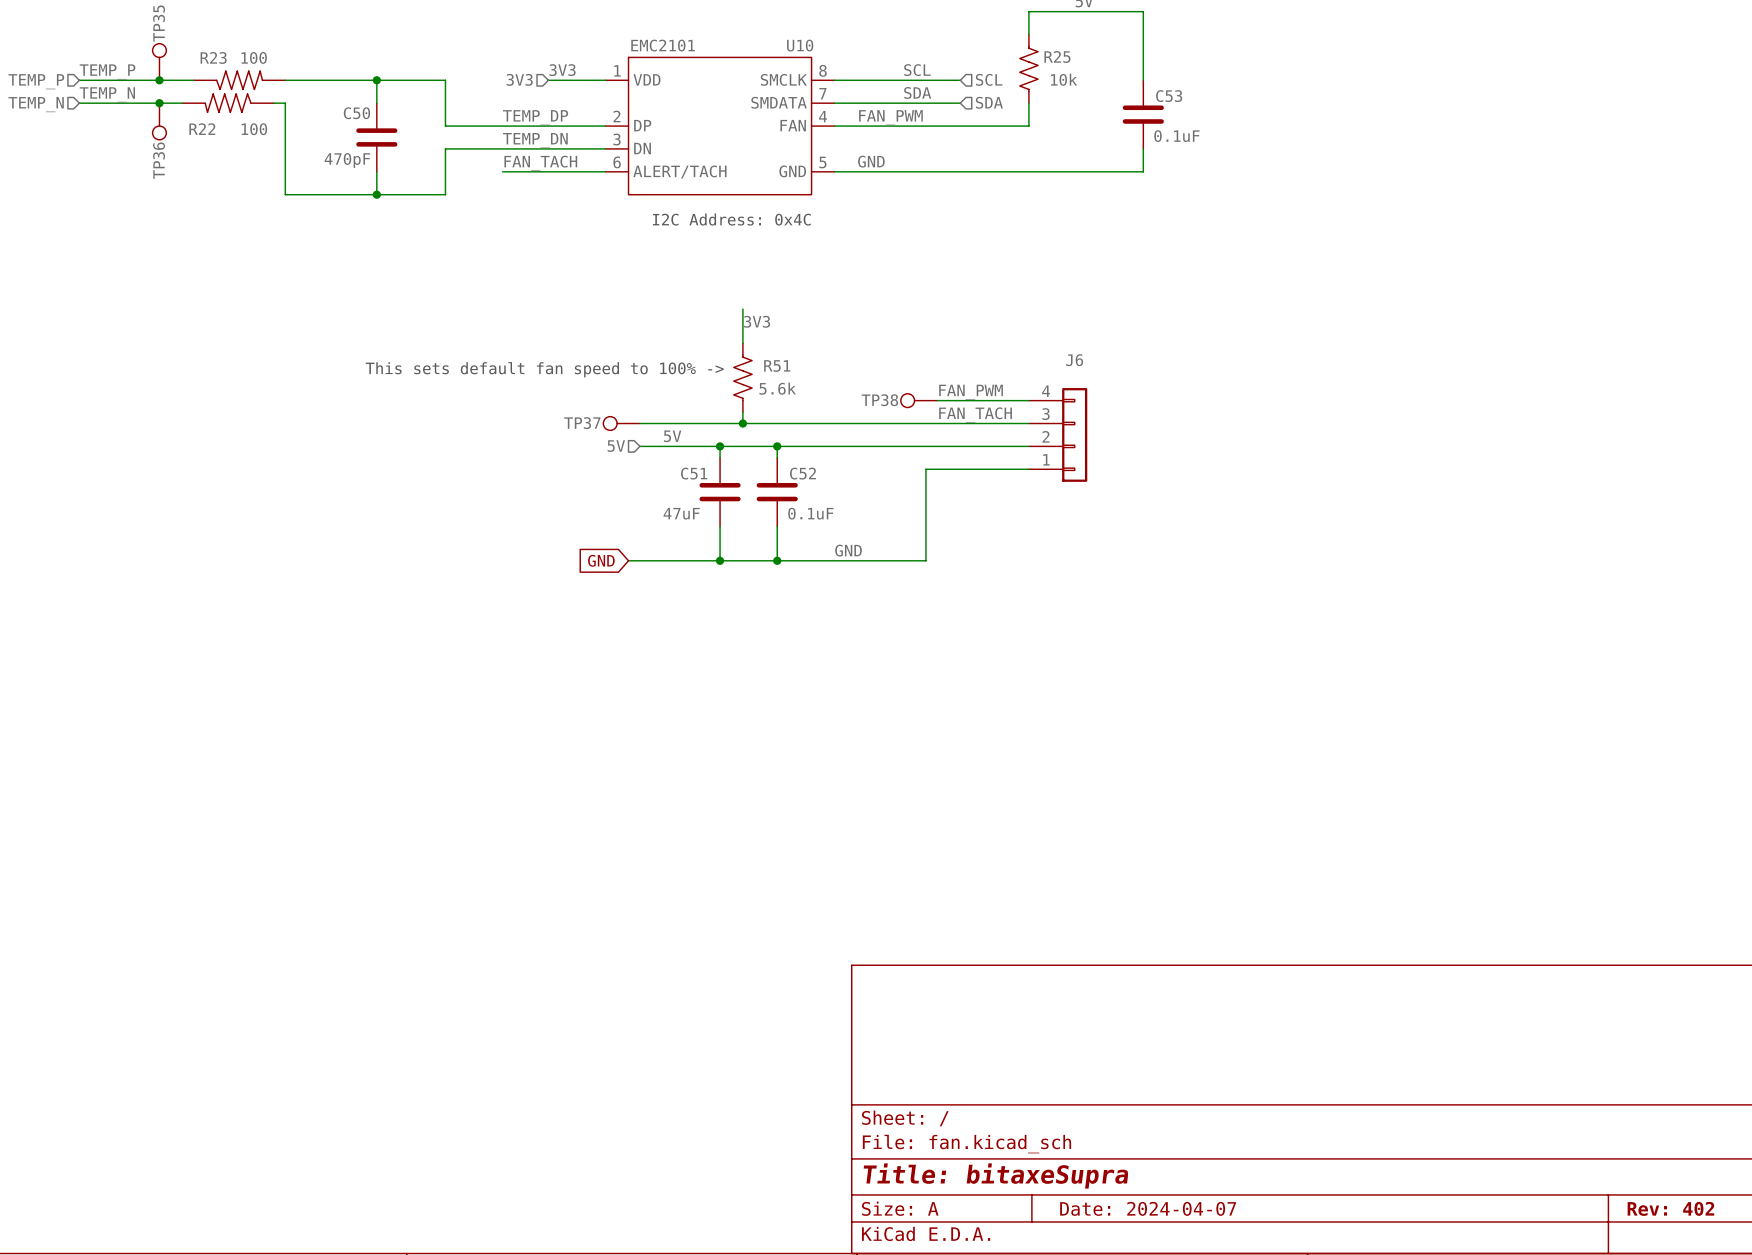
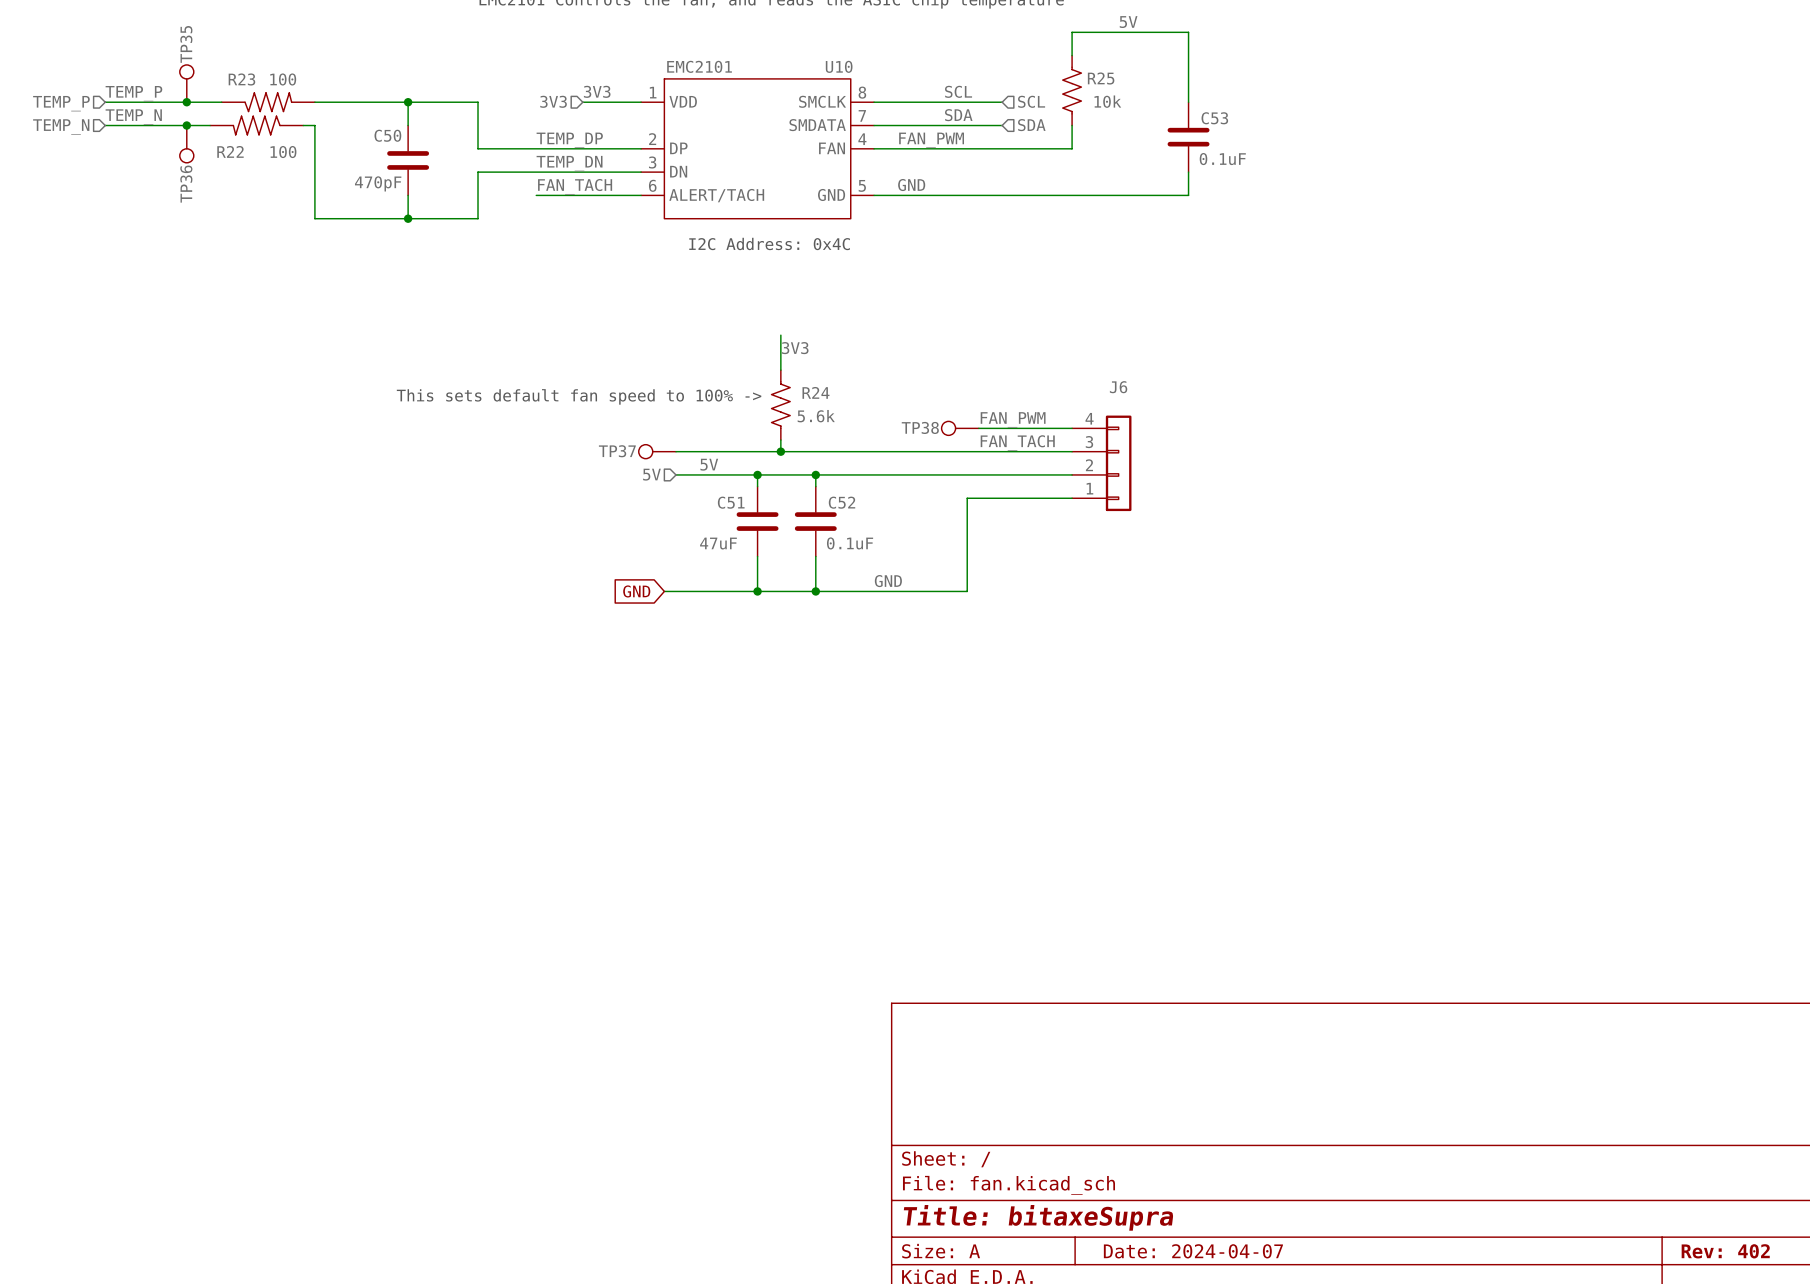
R51 name: R51 (777, 365) -> R24 (815, 392)

